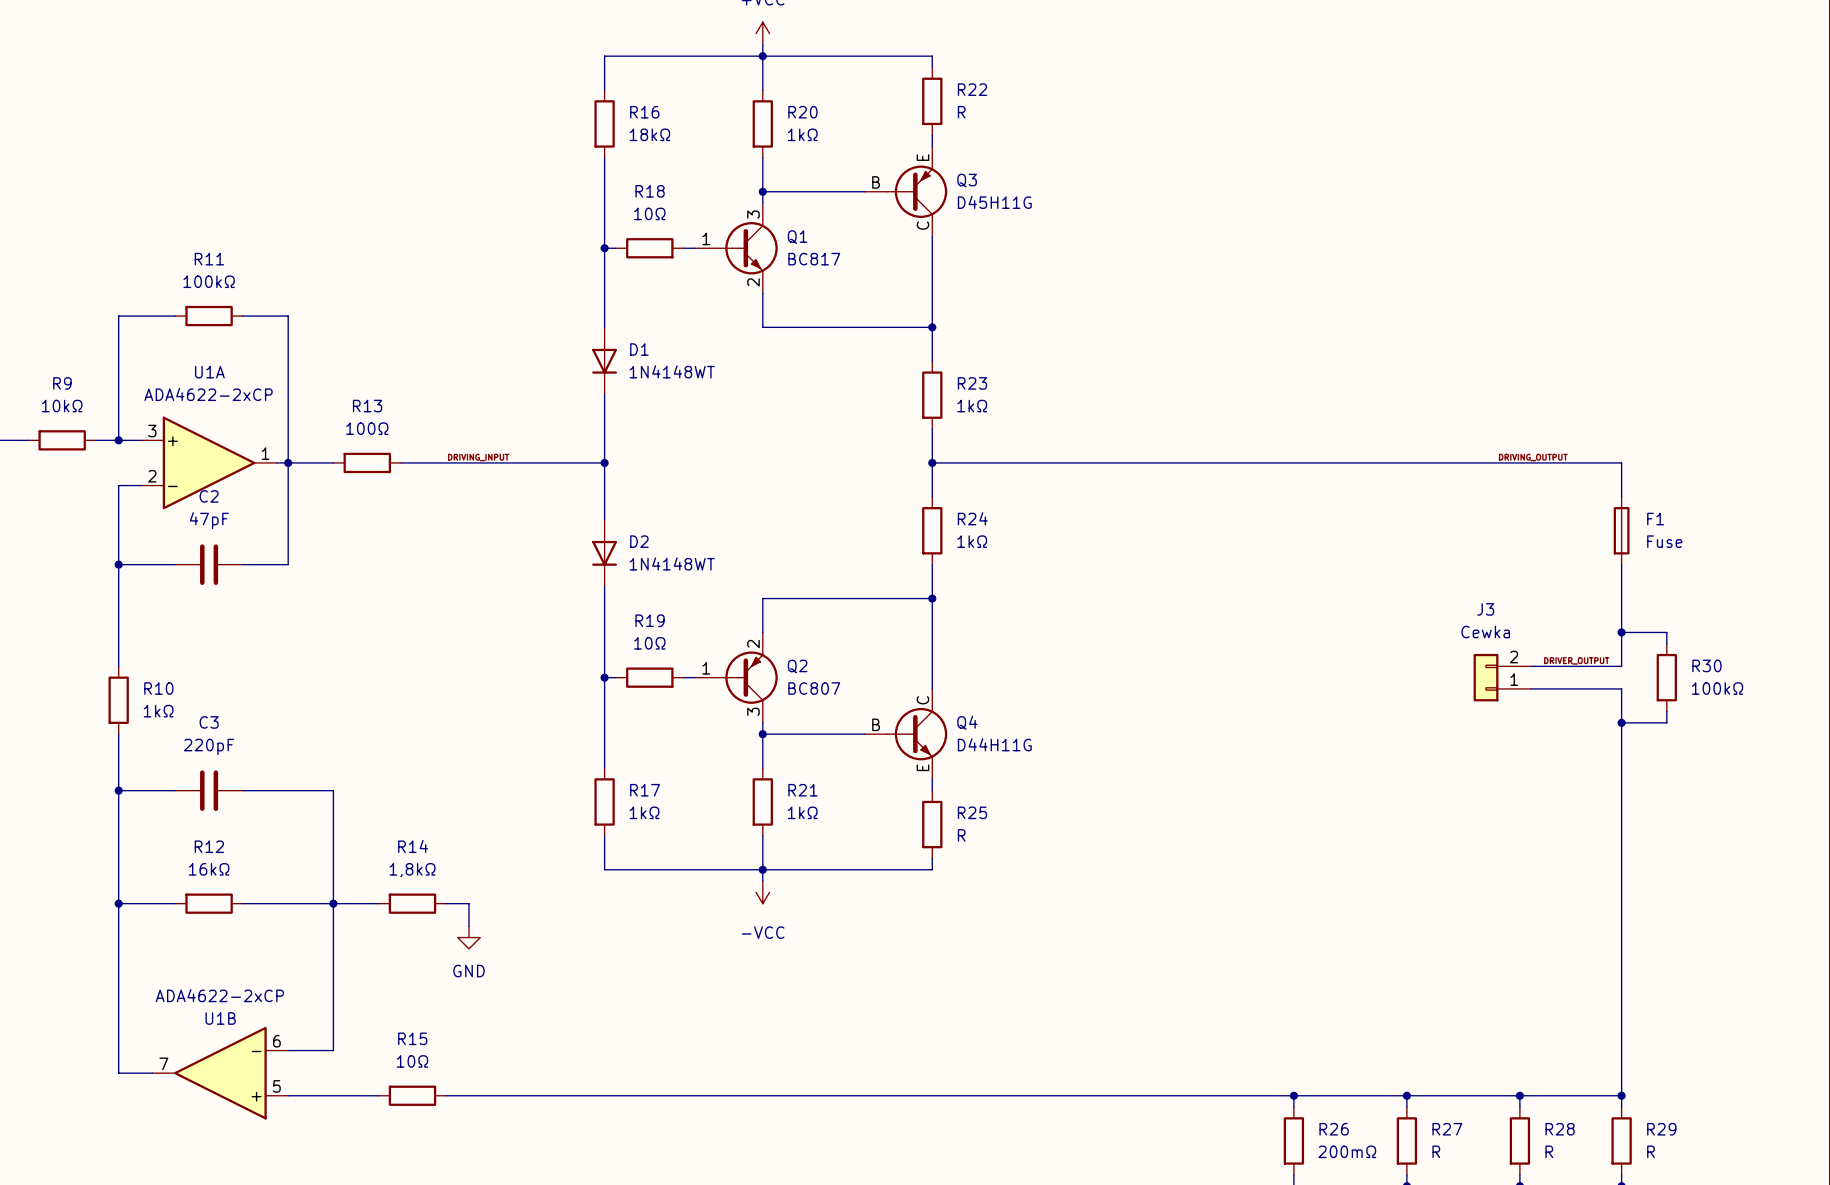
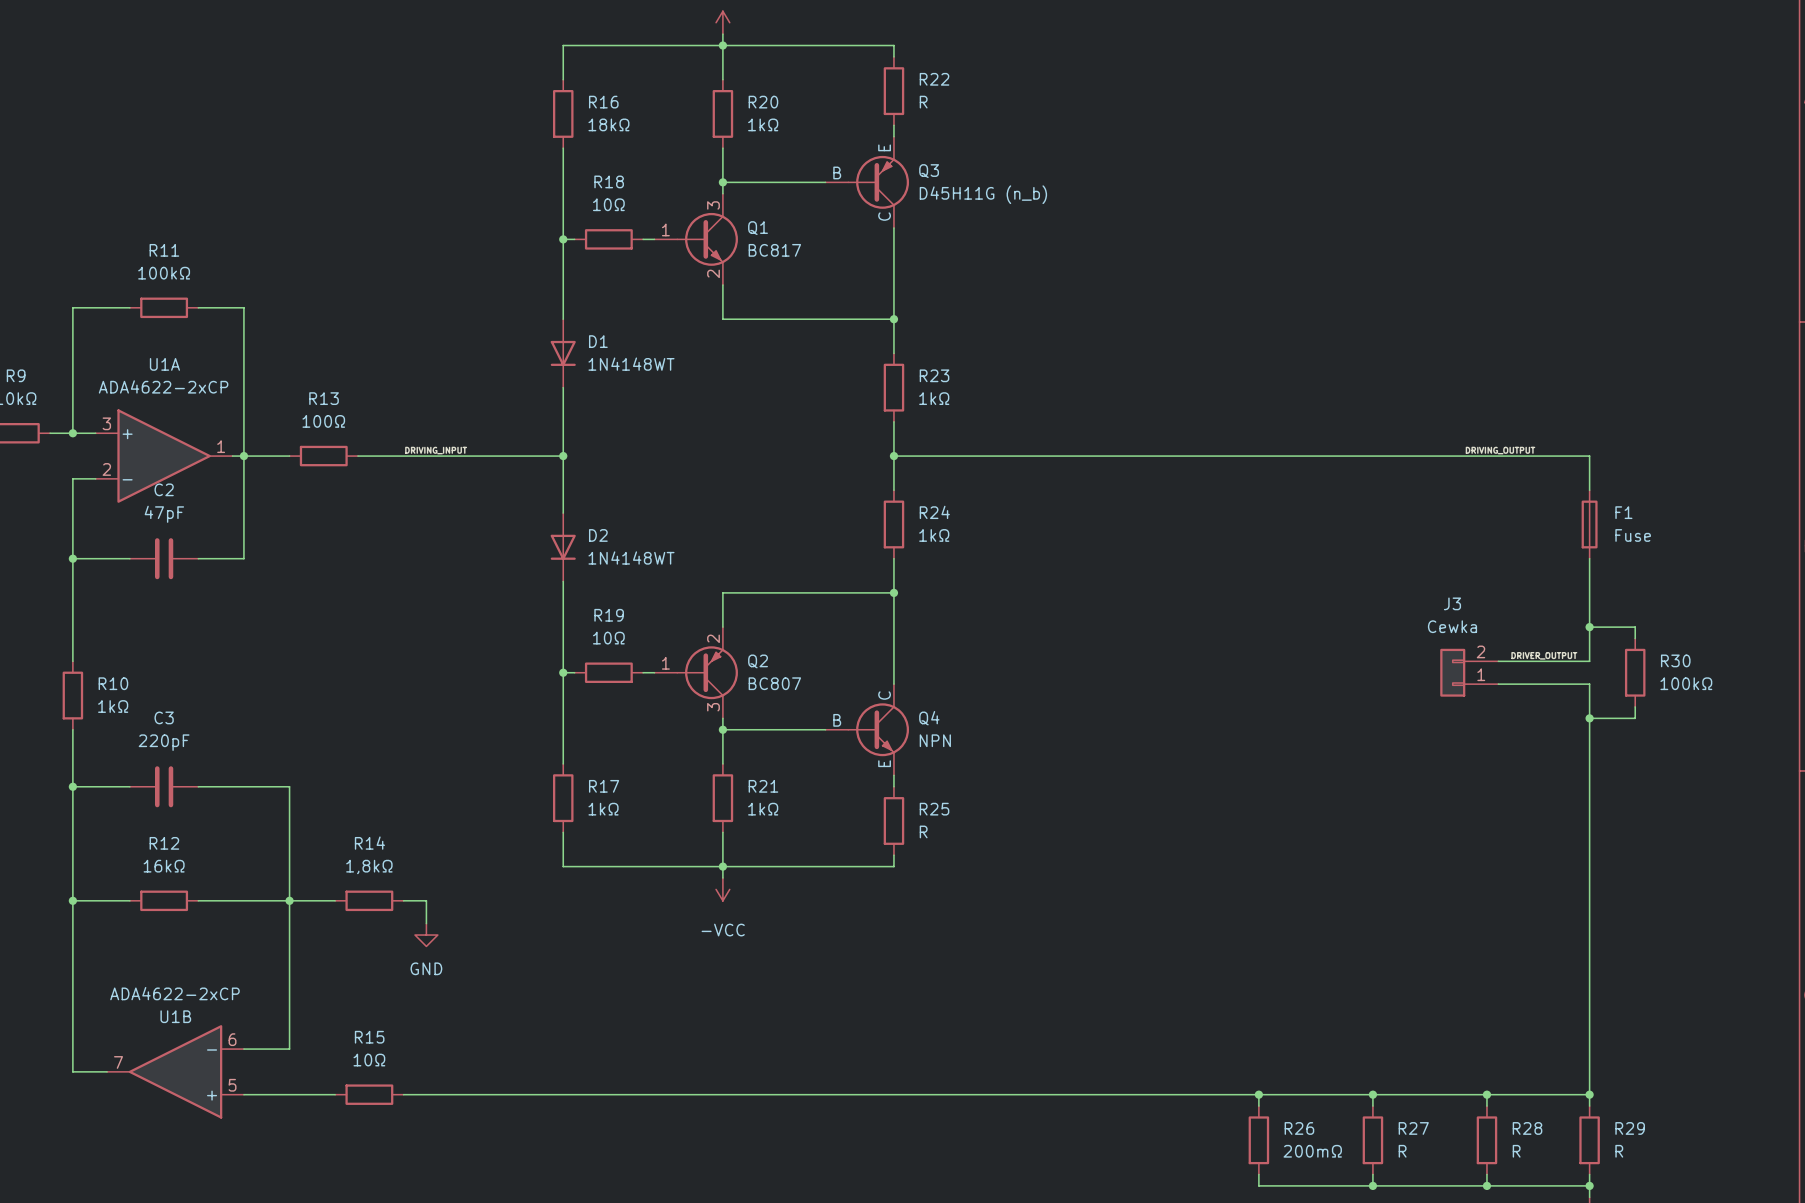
Q3 value: D45H11G (994, 202) -> D45H11G (n_b) (983, 194)
Q4 value: D44H11G (994, 744) -> NPN (935, 740)

